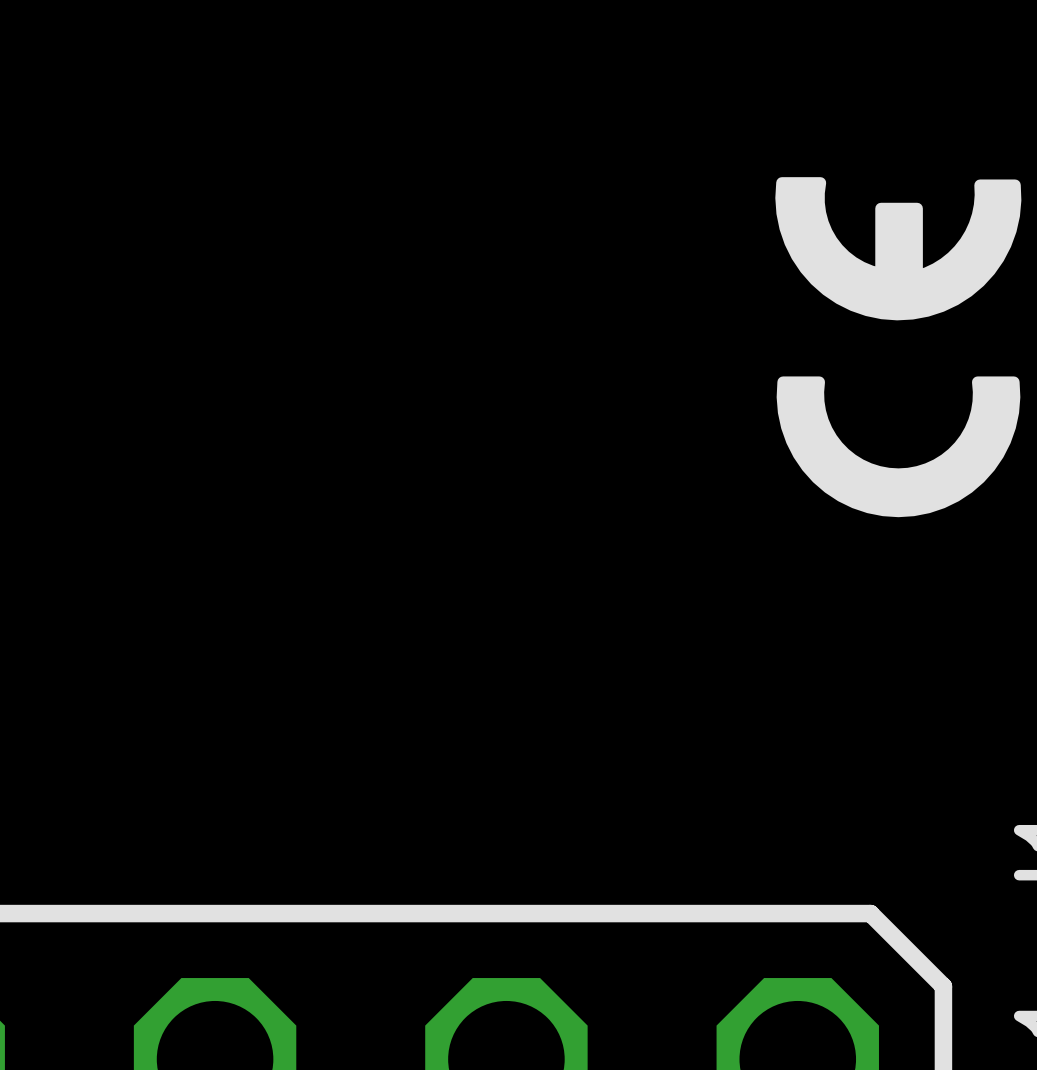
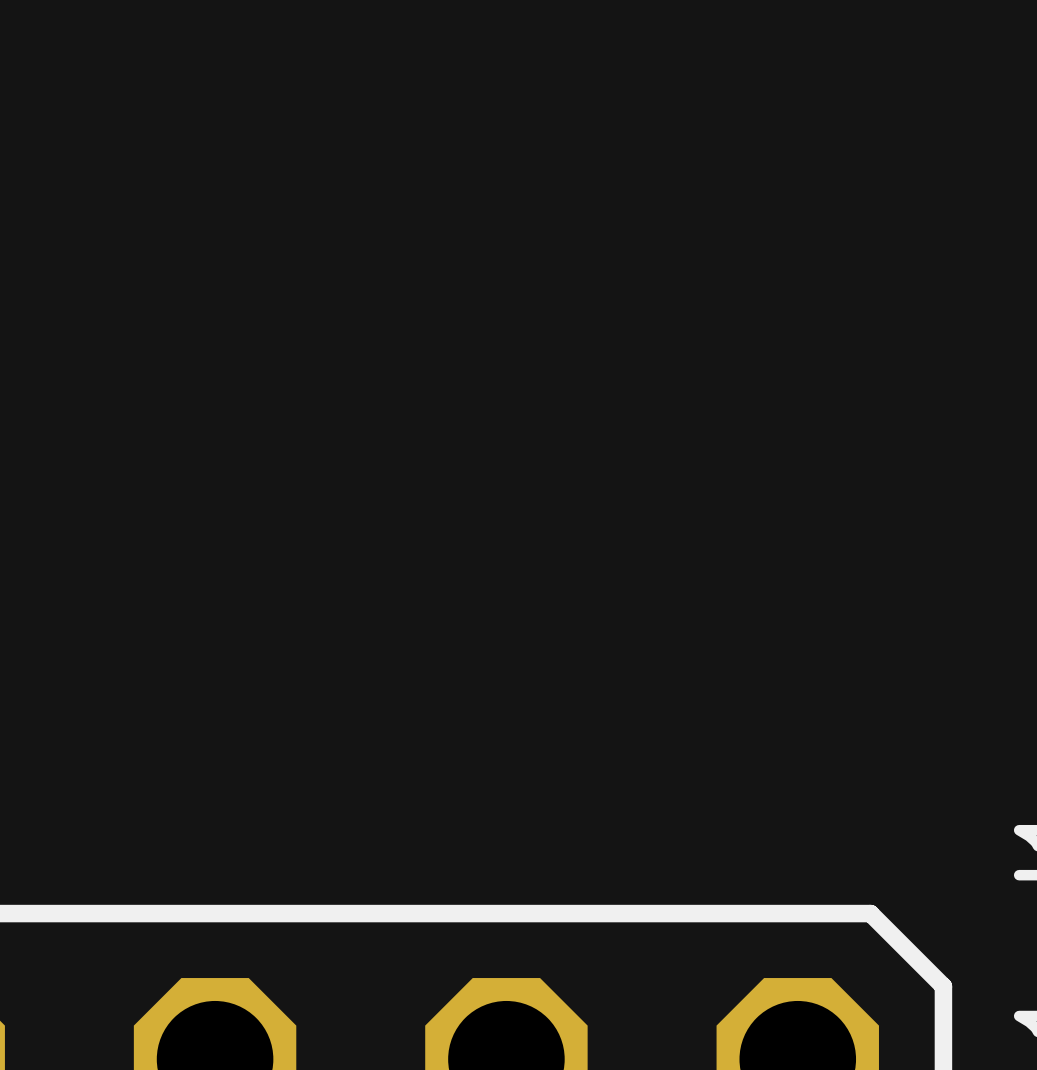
drawing: [775, 177, 1022, 518] -> none

